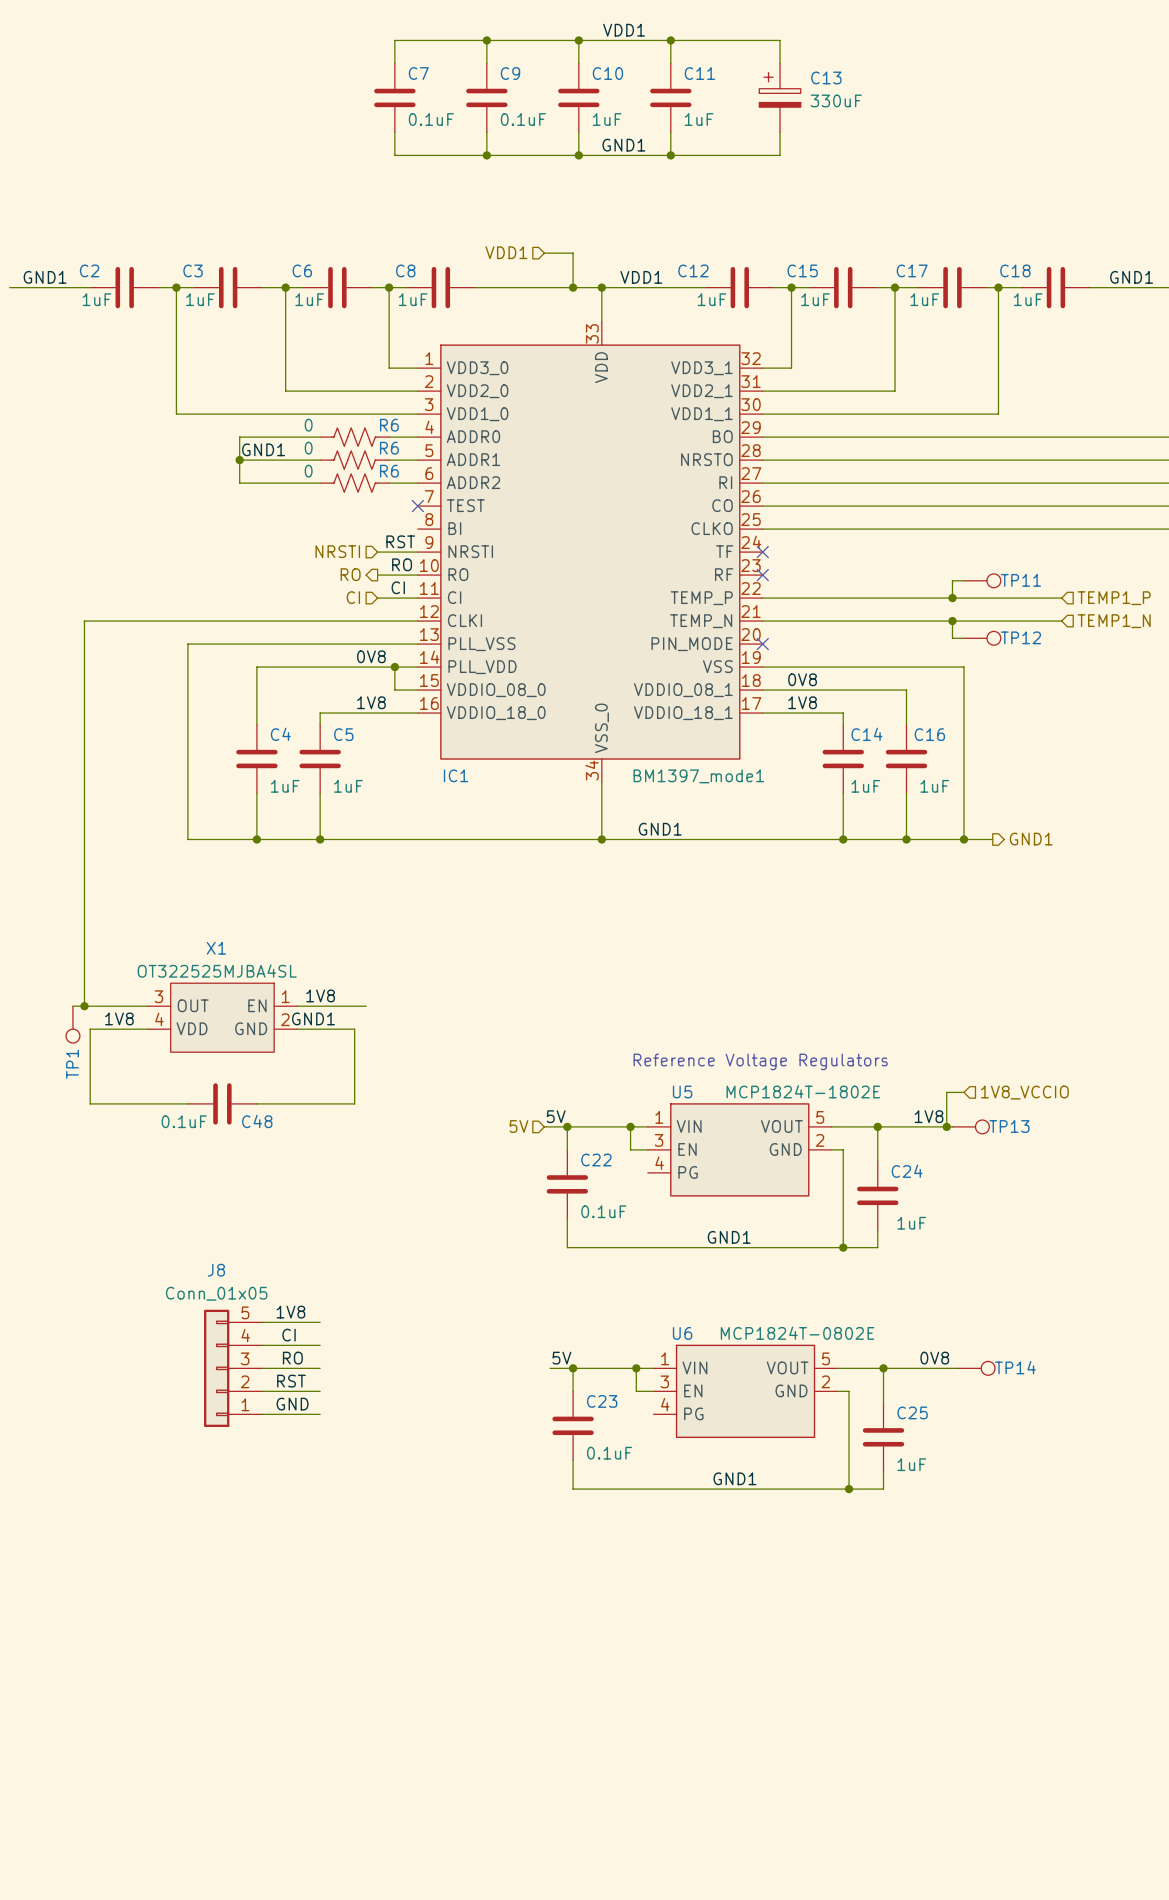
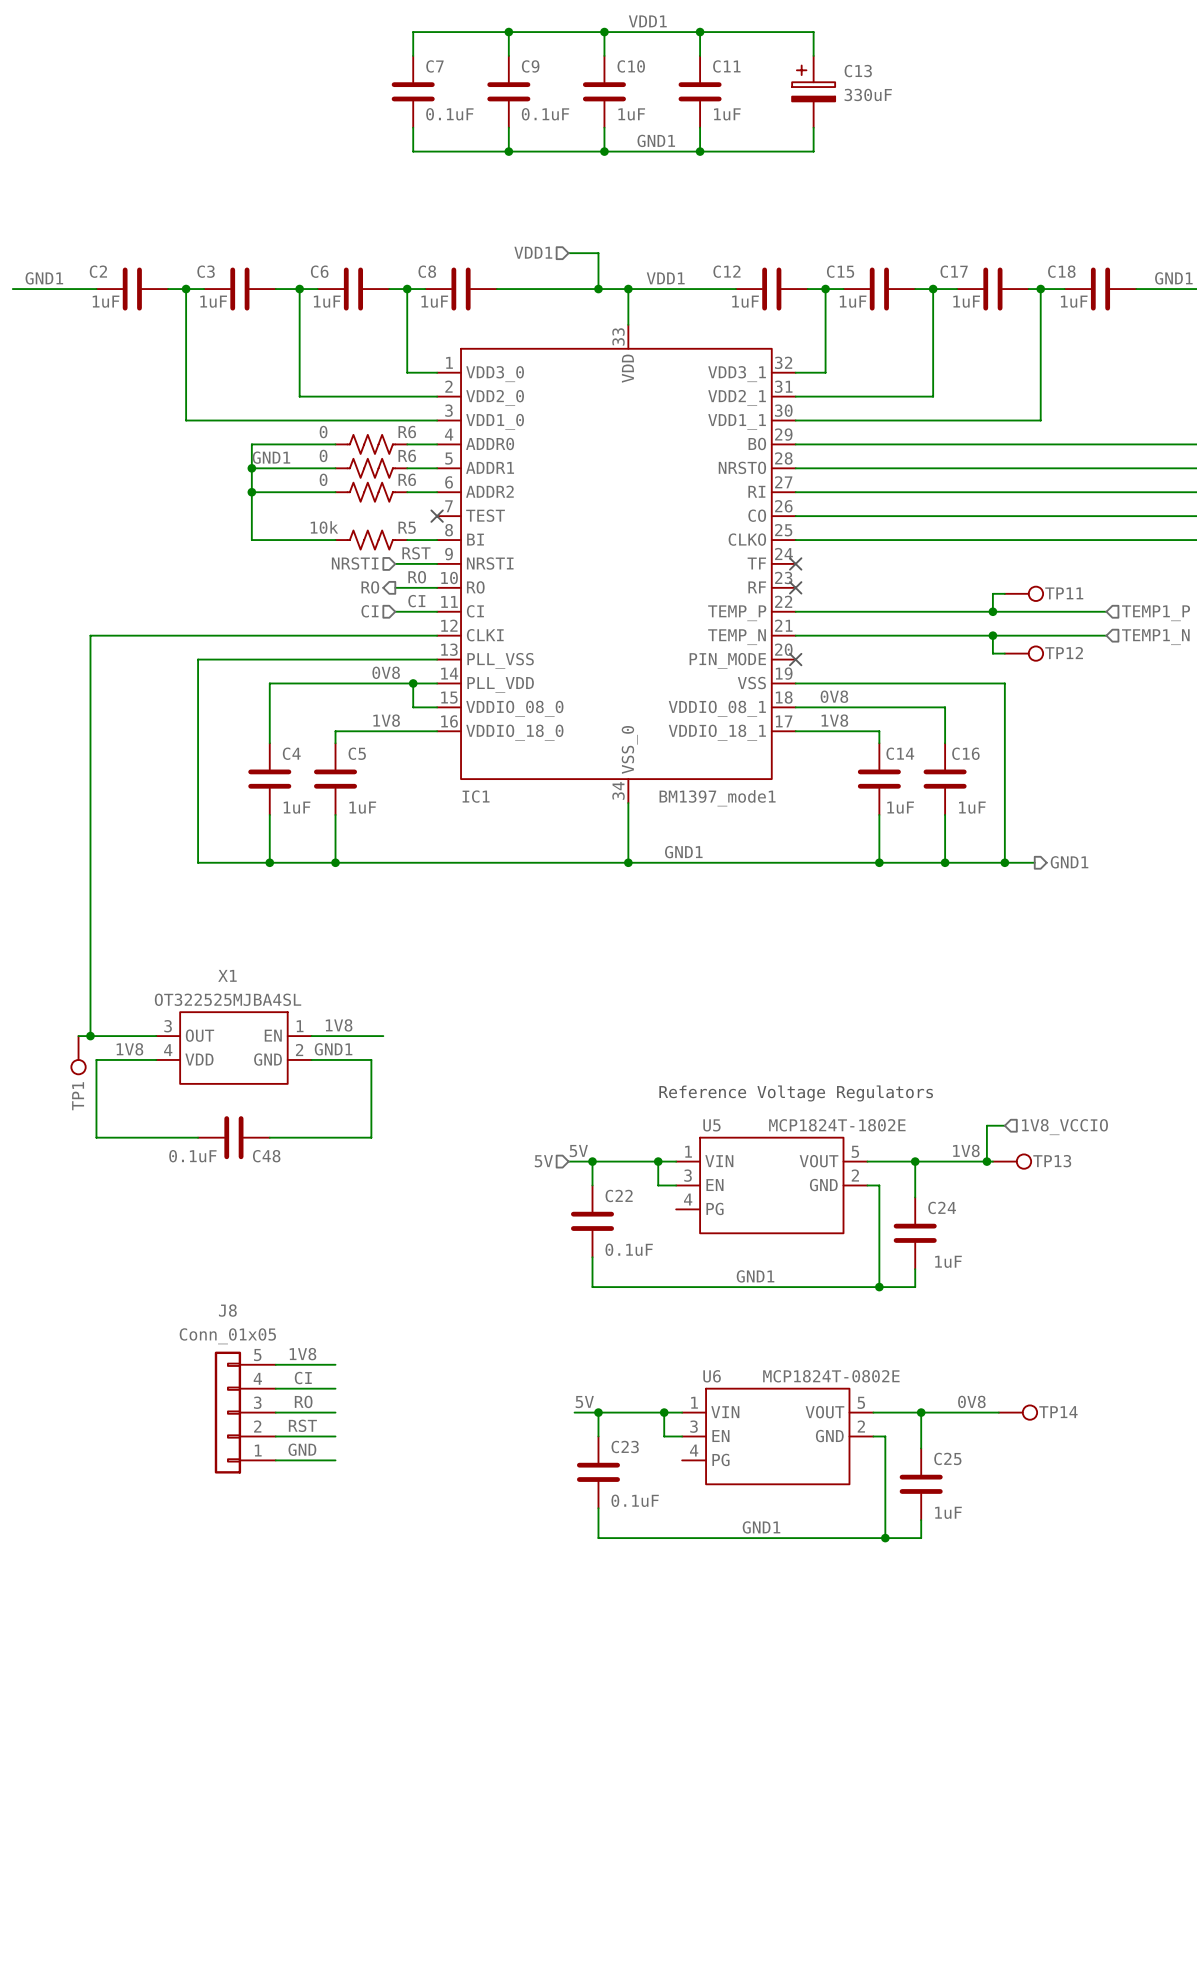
wire: none -> (251, 492) (251, 540) (335, 540)
junction: none -> (251, 492)
R5: none -> 10k (371, 540)
wire: none -> (407, 540) (437, 540)

